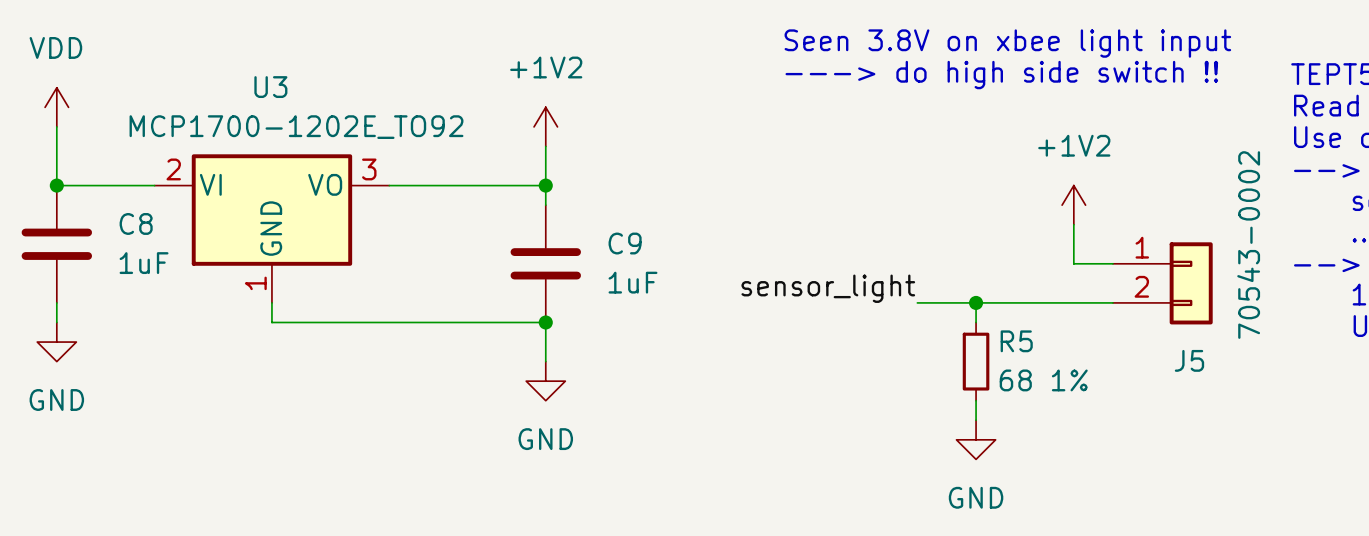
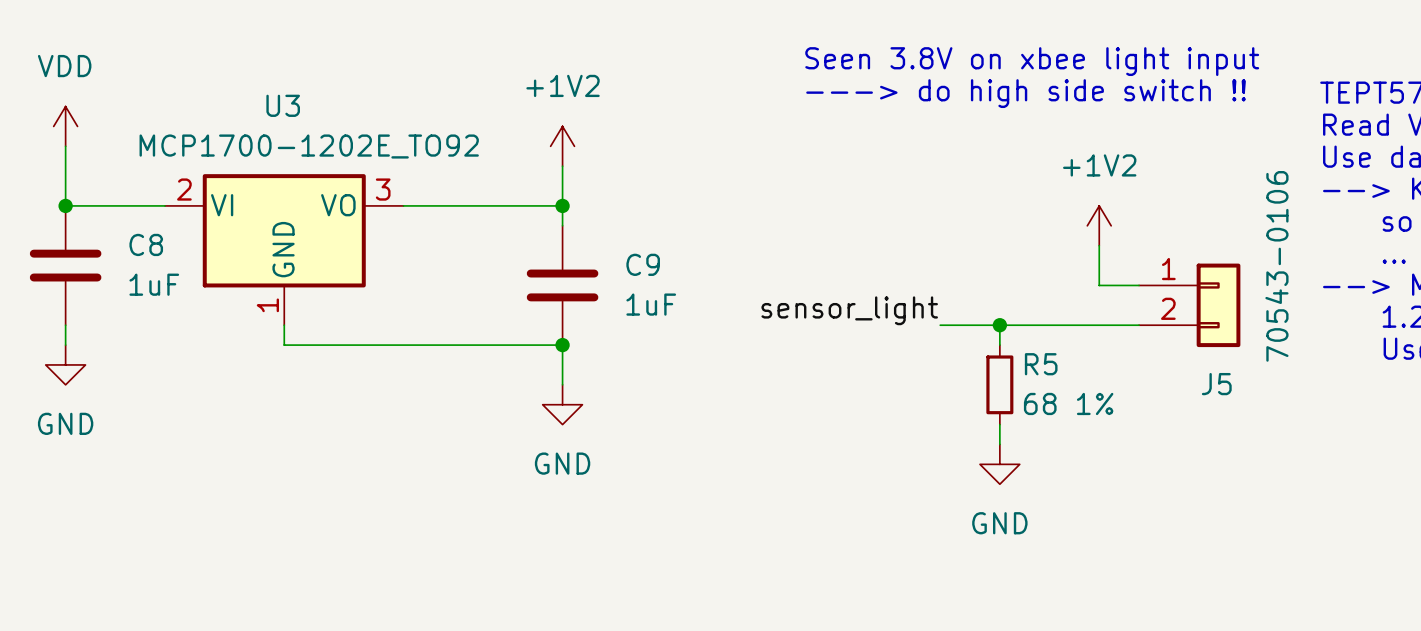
J5 value: 70543-0002 (1248, 245) -> 70543-0106 (1276, 266)

